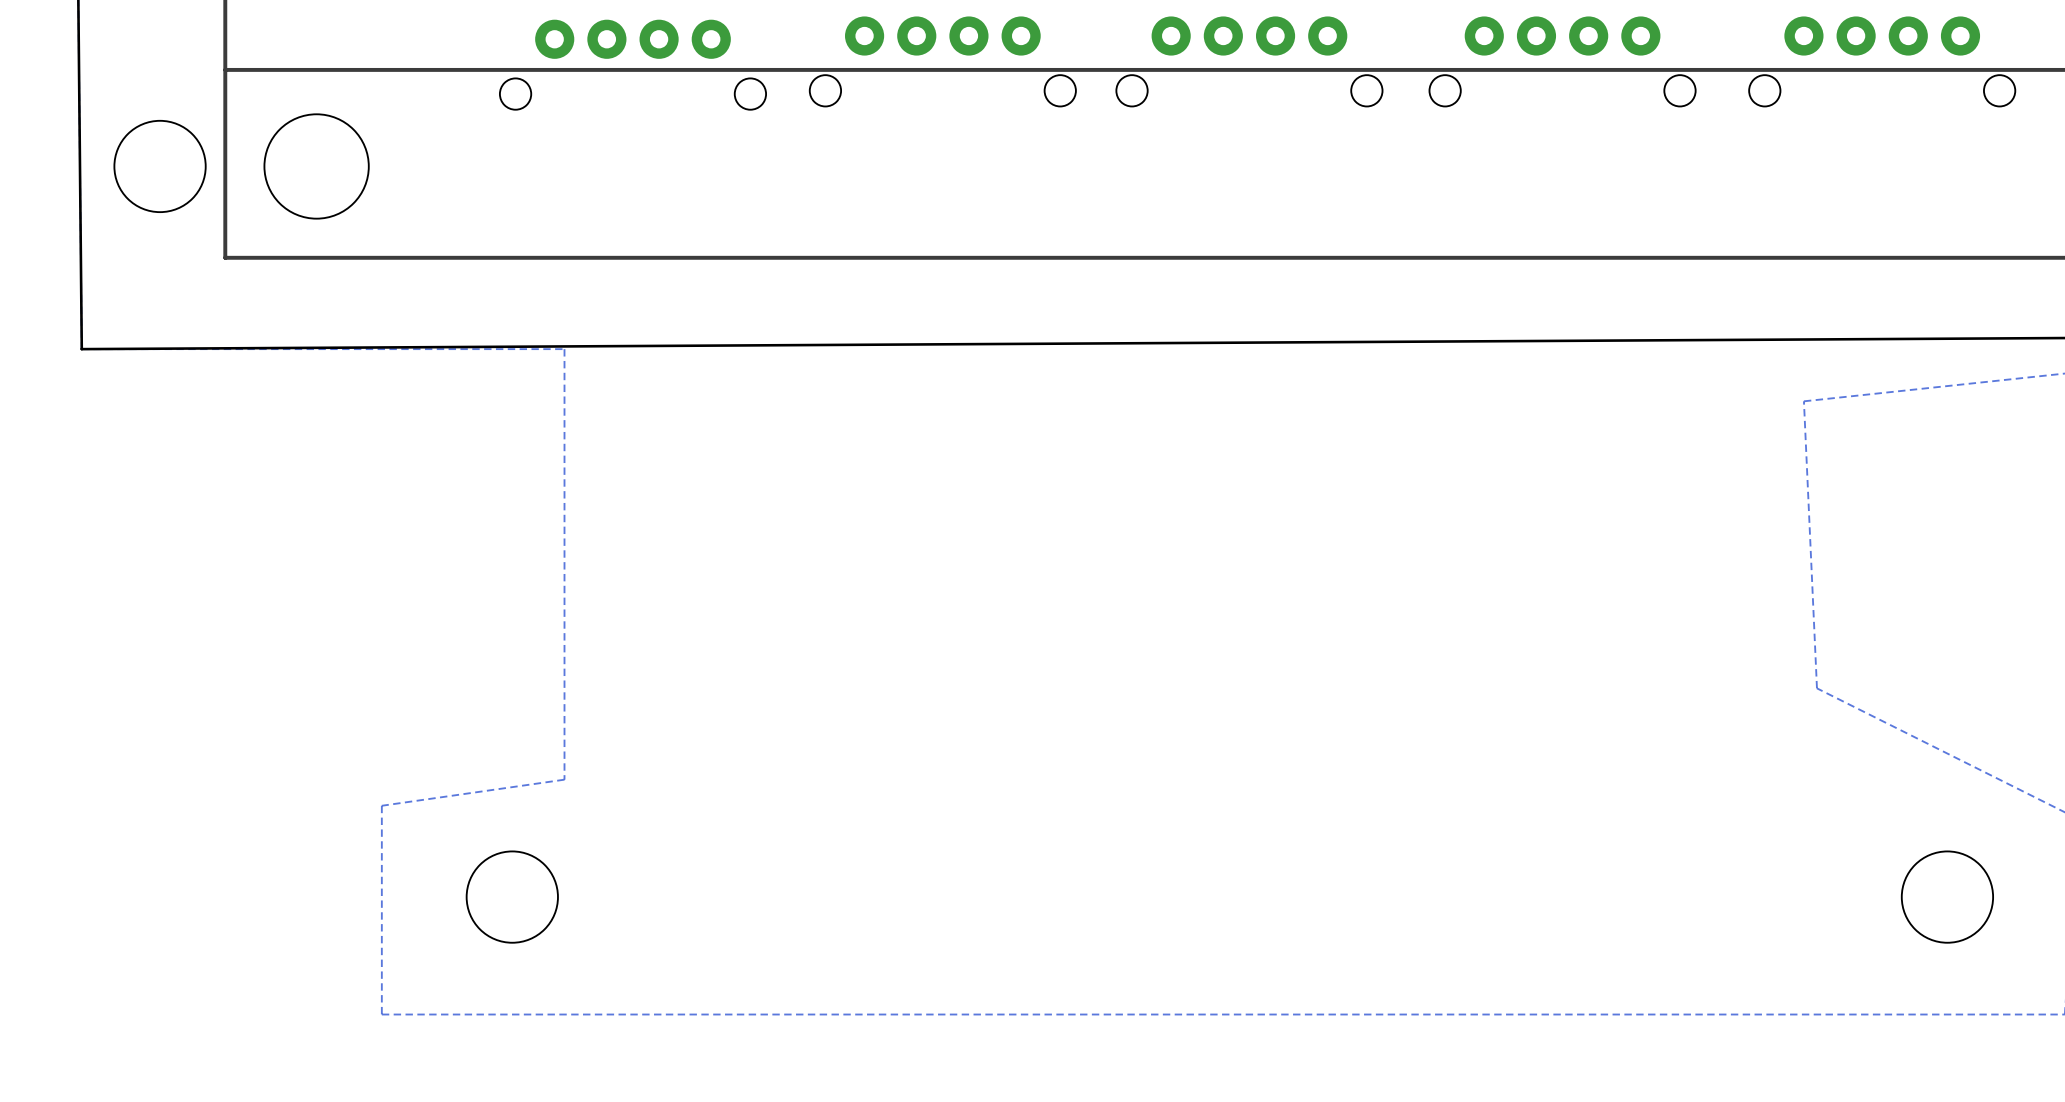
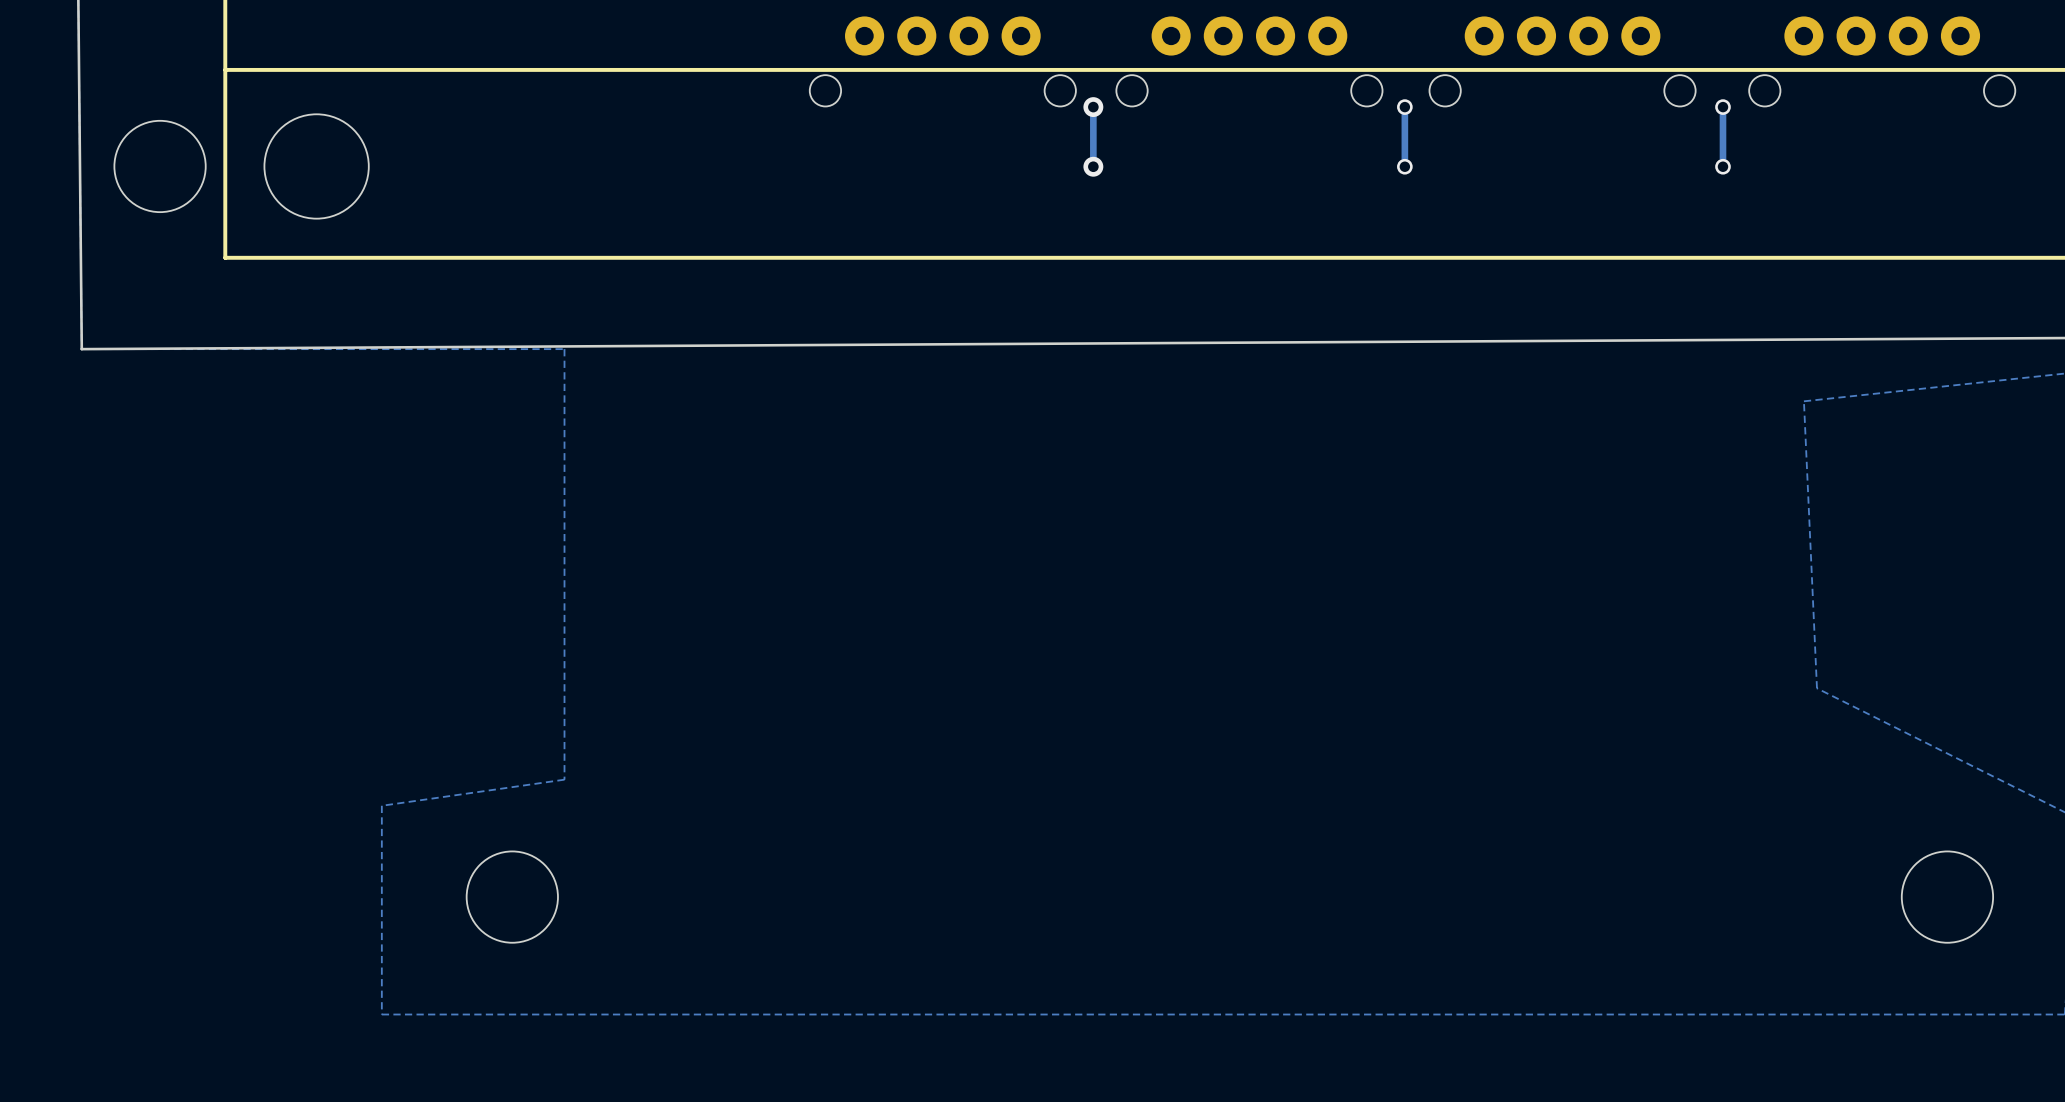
part: (632, 64) -> none
track: none -> (1093, 107) (1093, 166)
via: none -> (1093, 107)
track: none -> (1404, 107) (1404, 166)
via: none -> (1404, 107)
track: none -> (1722, 107) (1722, 166)
via: none -> (1722, 107)
via: none -> (1093, 166)
via: none -> (1404, 166)
via: none -> (1722, 166)

